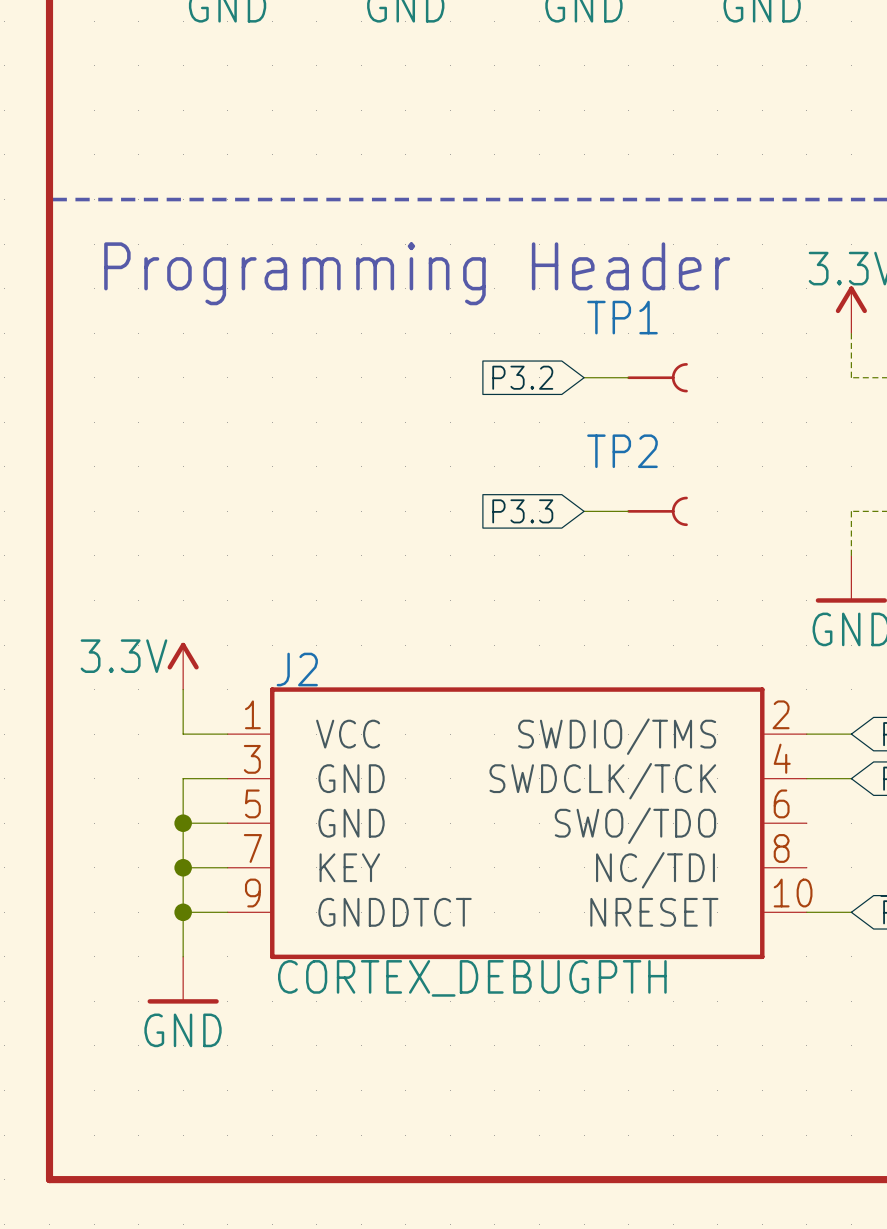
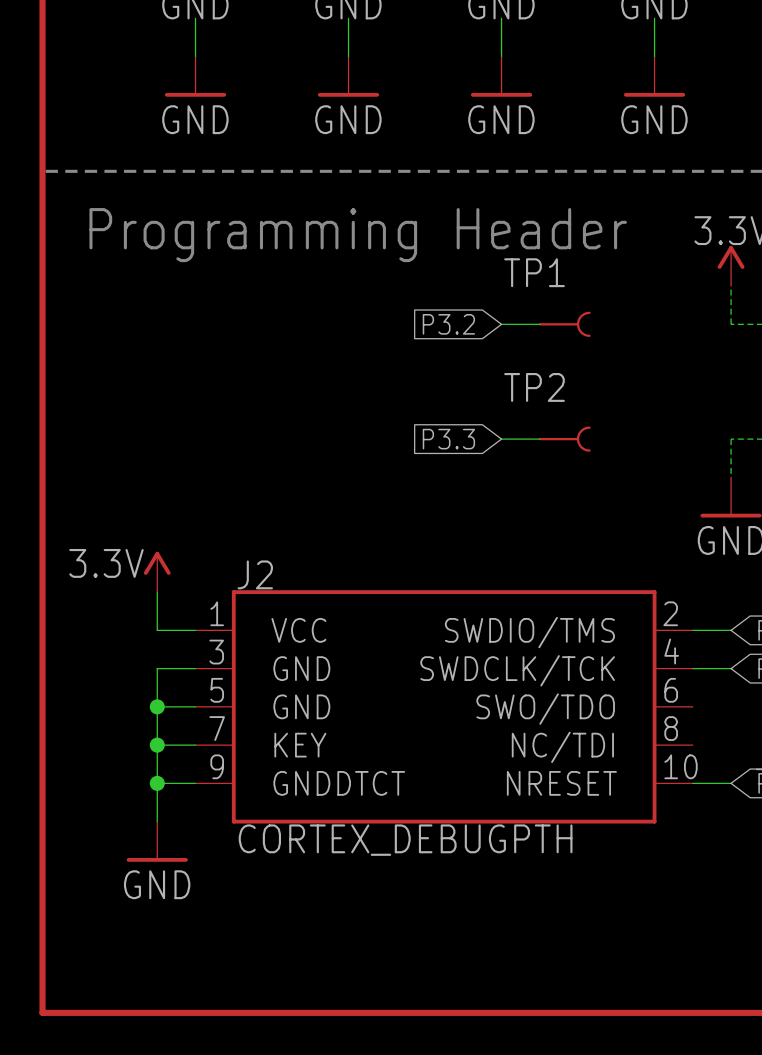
wire: none -> (195, 18) (195, 56)
wire: none -> (348, 18) (348, 56)
wire: none -> (501, 18) (501, 56)
wire: none -> (654, 18) (654, 56)
power symbol: none -> GND (195, 76)
power symbol: none -> GND (348, 76)
power symbol: none -> GND (501, 76)
power symbol: none -> GND (654, 76)

